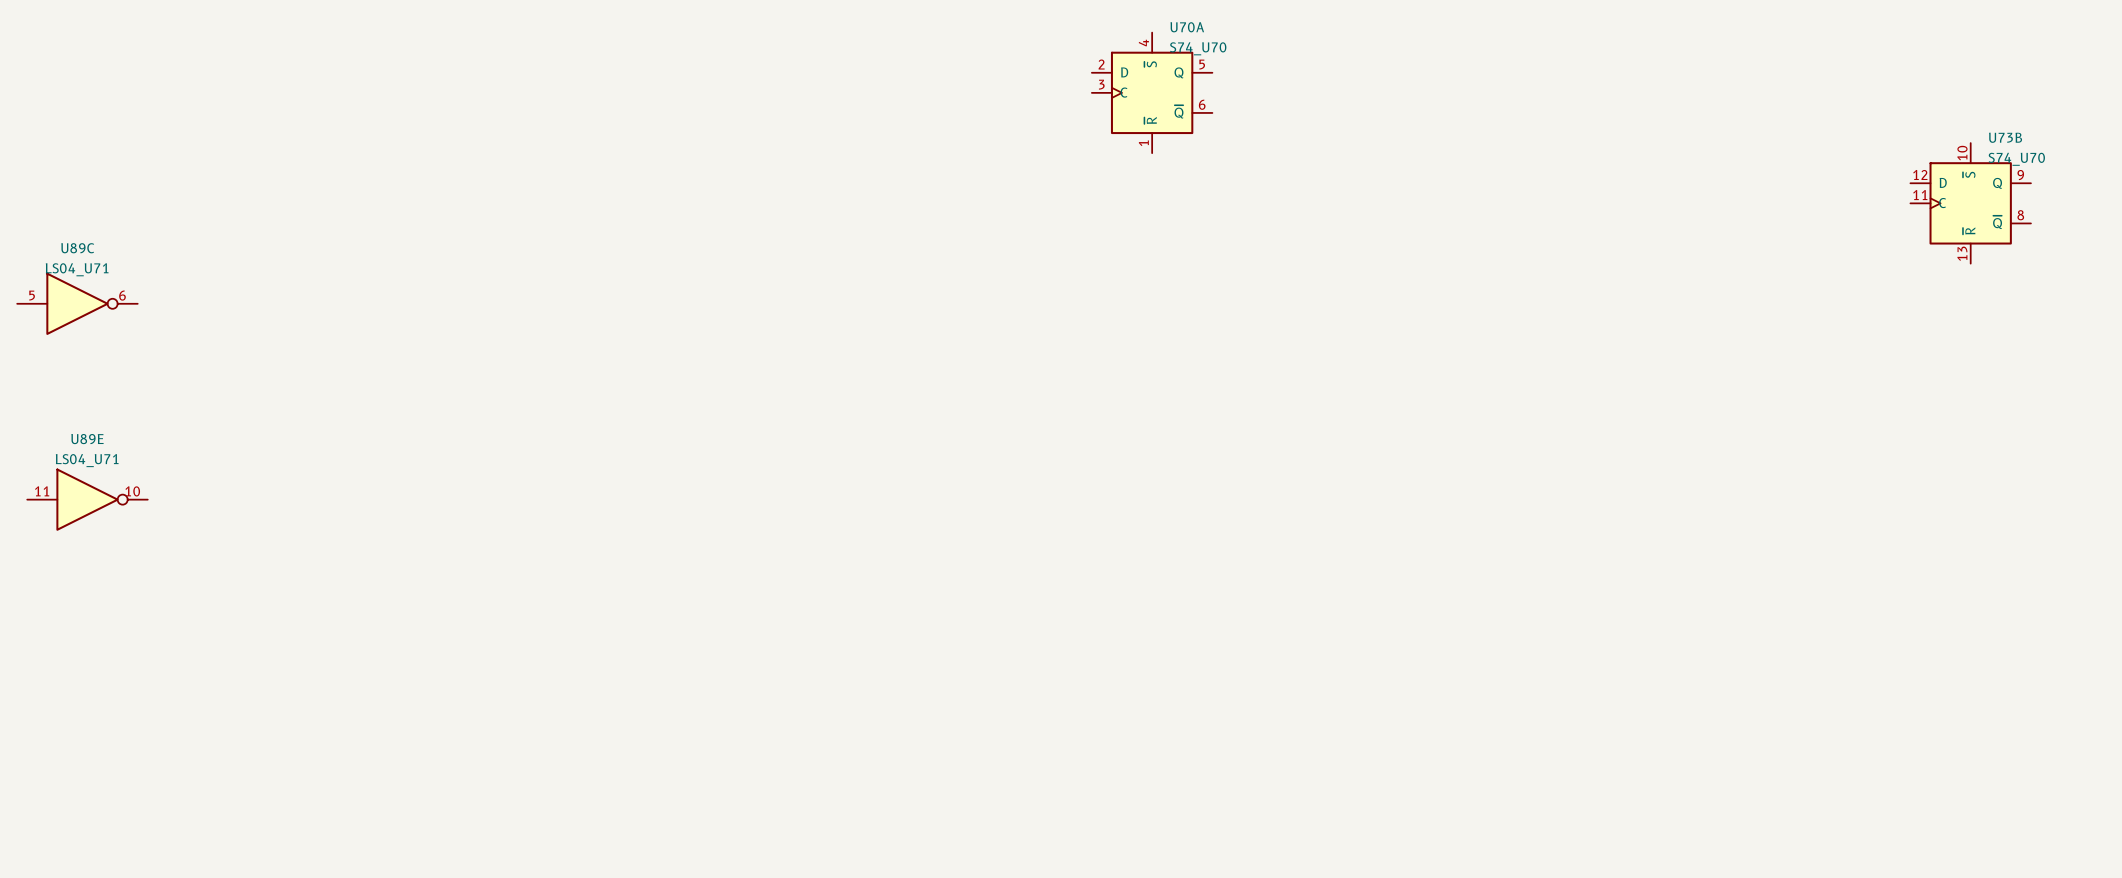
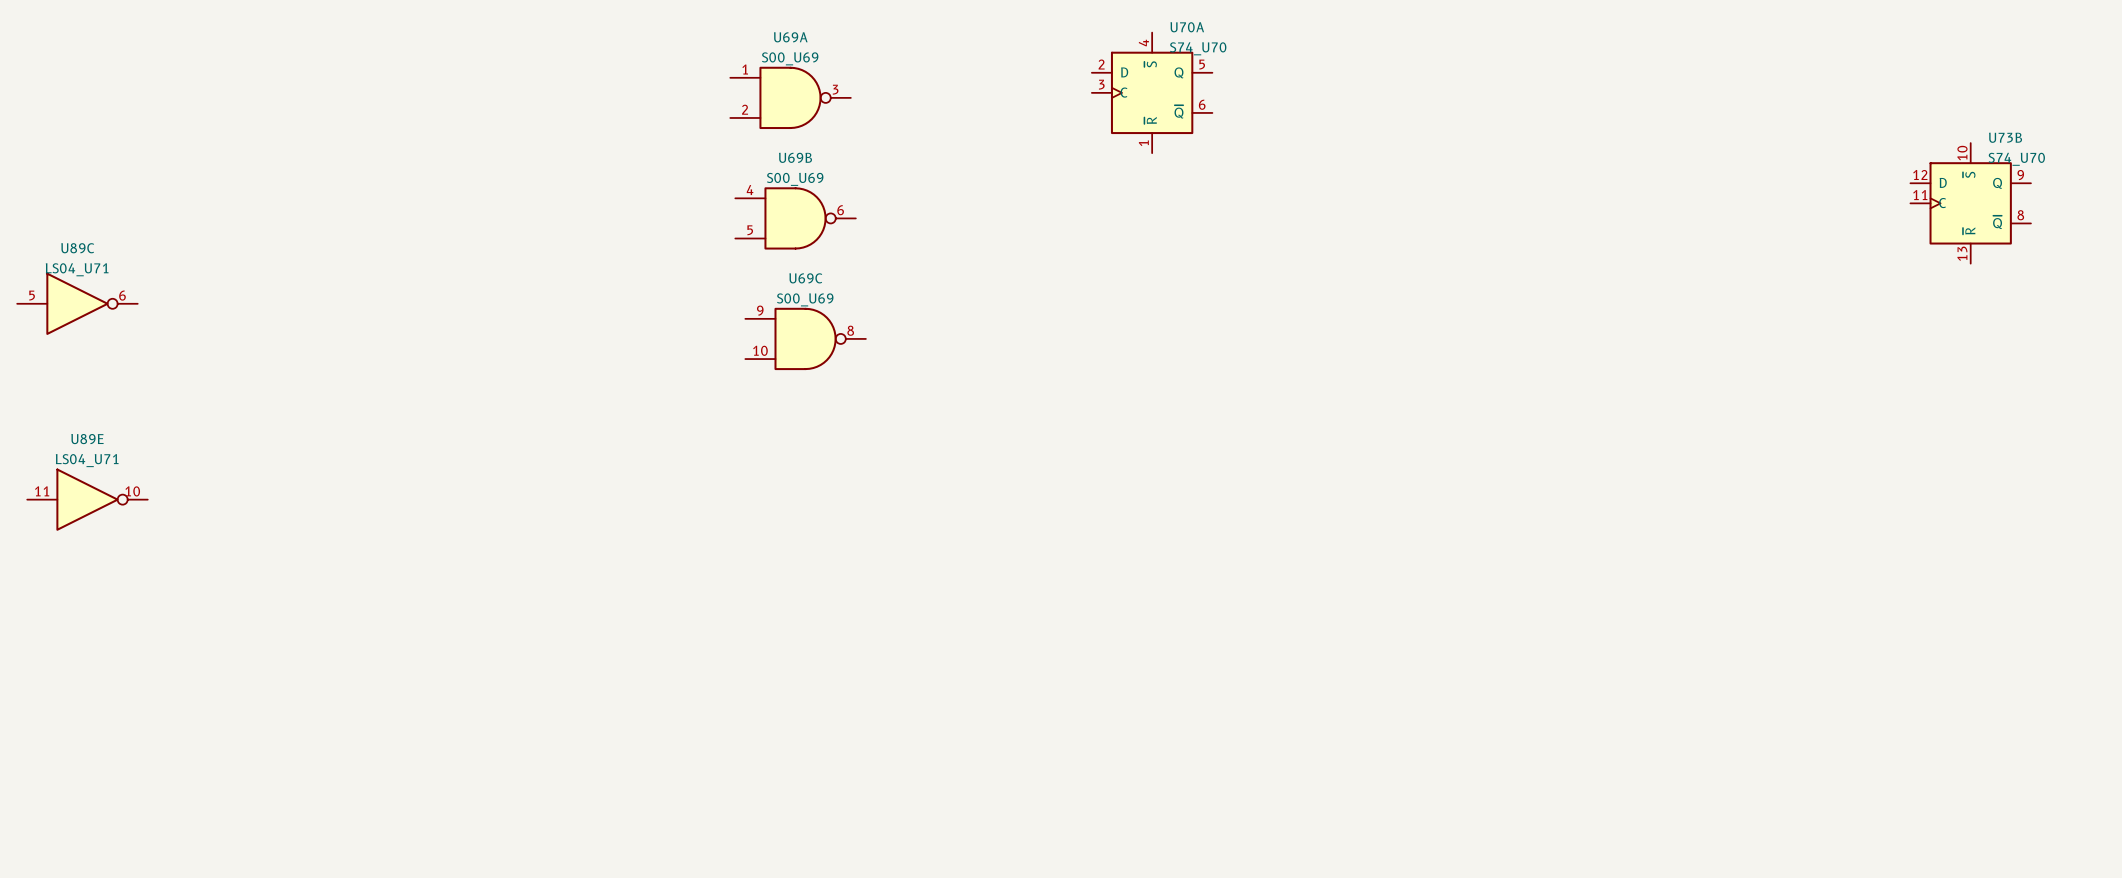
U69A: none -> S00_U69 (790, 97)
U69B: none -> S00_U69 (795, 218)
U69C: none -> S00_U69 (805, 338)

